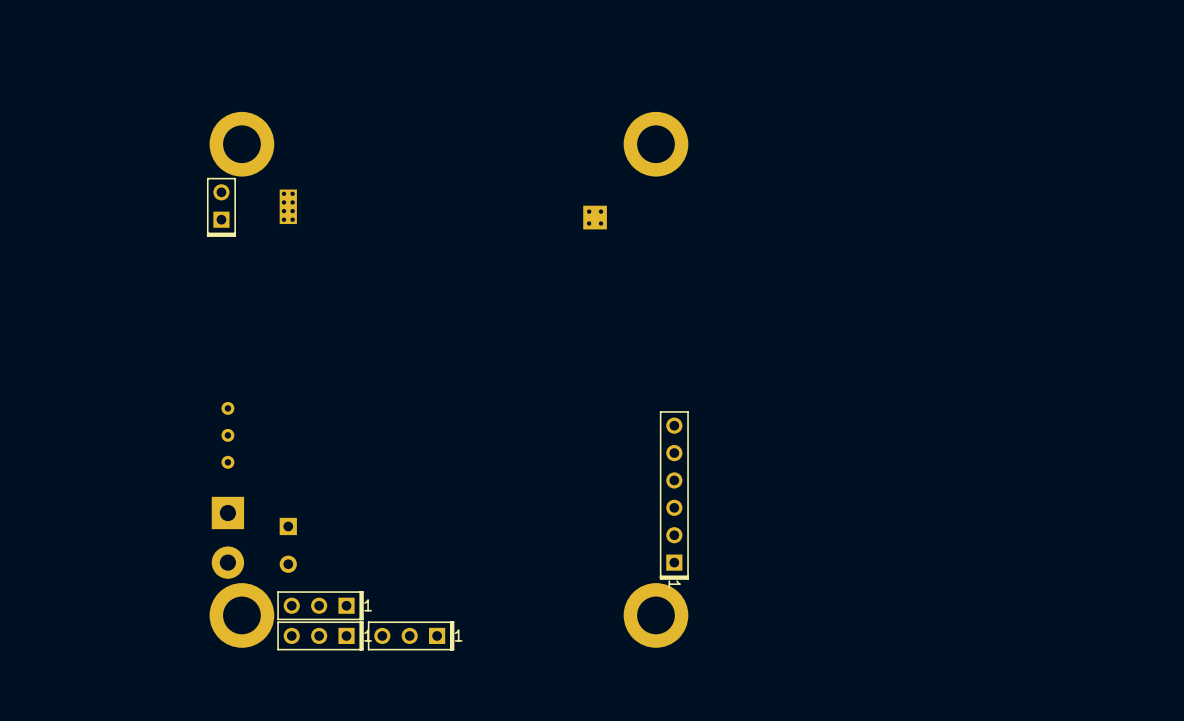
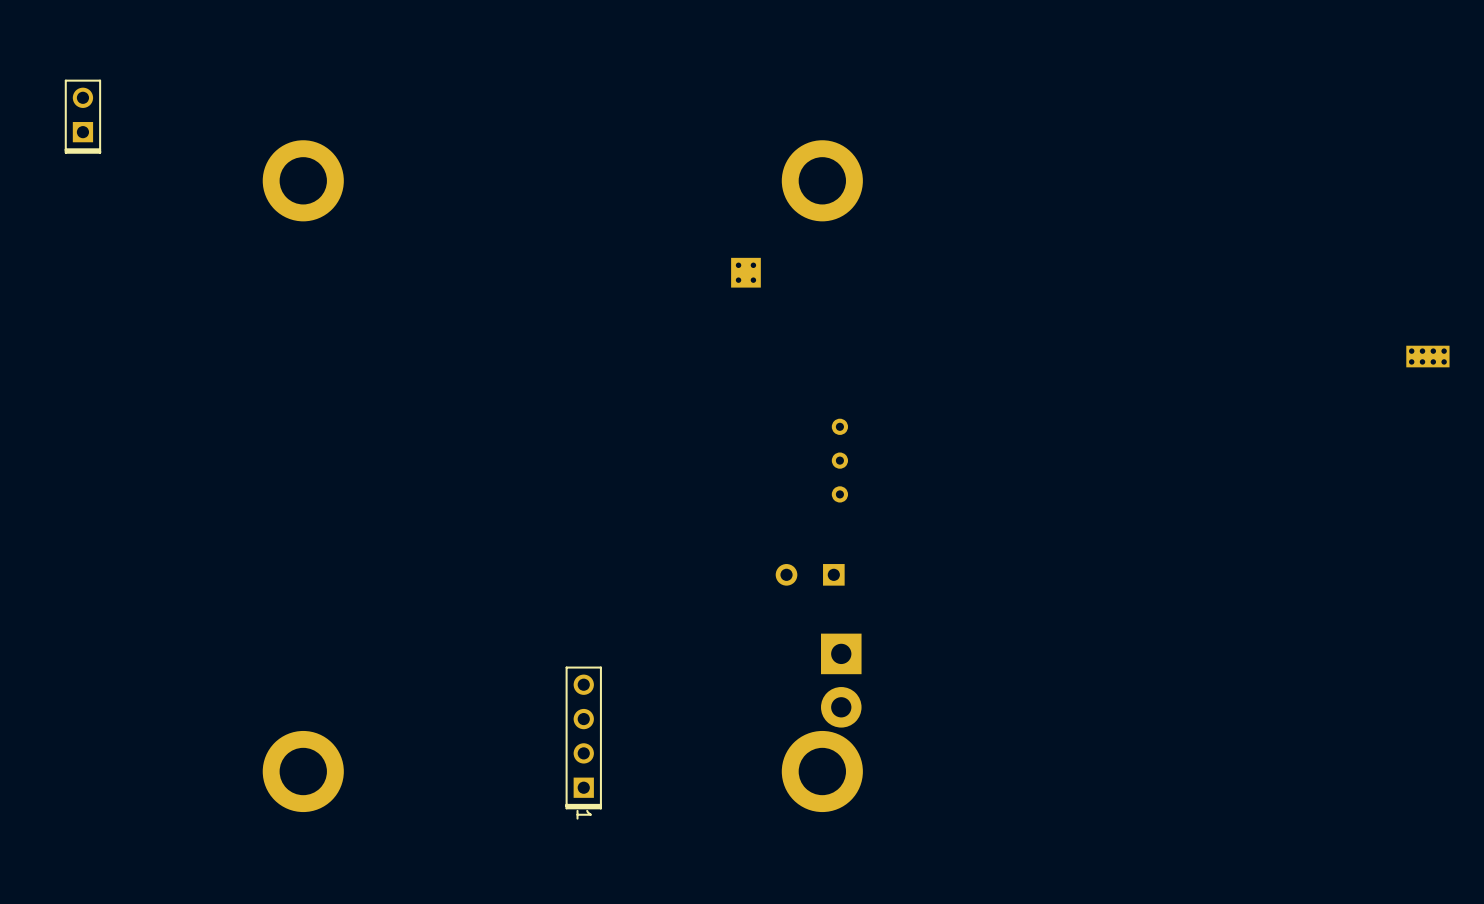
part: (288, 206) -> none
part position: (221, 207) -> (82, 116)
part: none -> (1427, 356)
part: none -> (839, 460)
part: (227, 435) -> none
part: none -> (810, 574)
part: (674, 495) -> none
part: (227, 513) -> none
part: none -> (841, 653)
part: (288, 545) -> none
part: (227, 562) -> none
part: none -> (841, 707)
part: none -> (583, 737)
part: (320, 605) -> none
part: (320, 635) -> none
part: (411, 635) -> none

